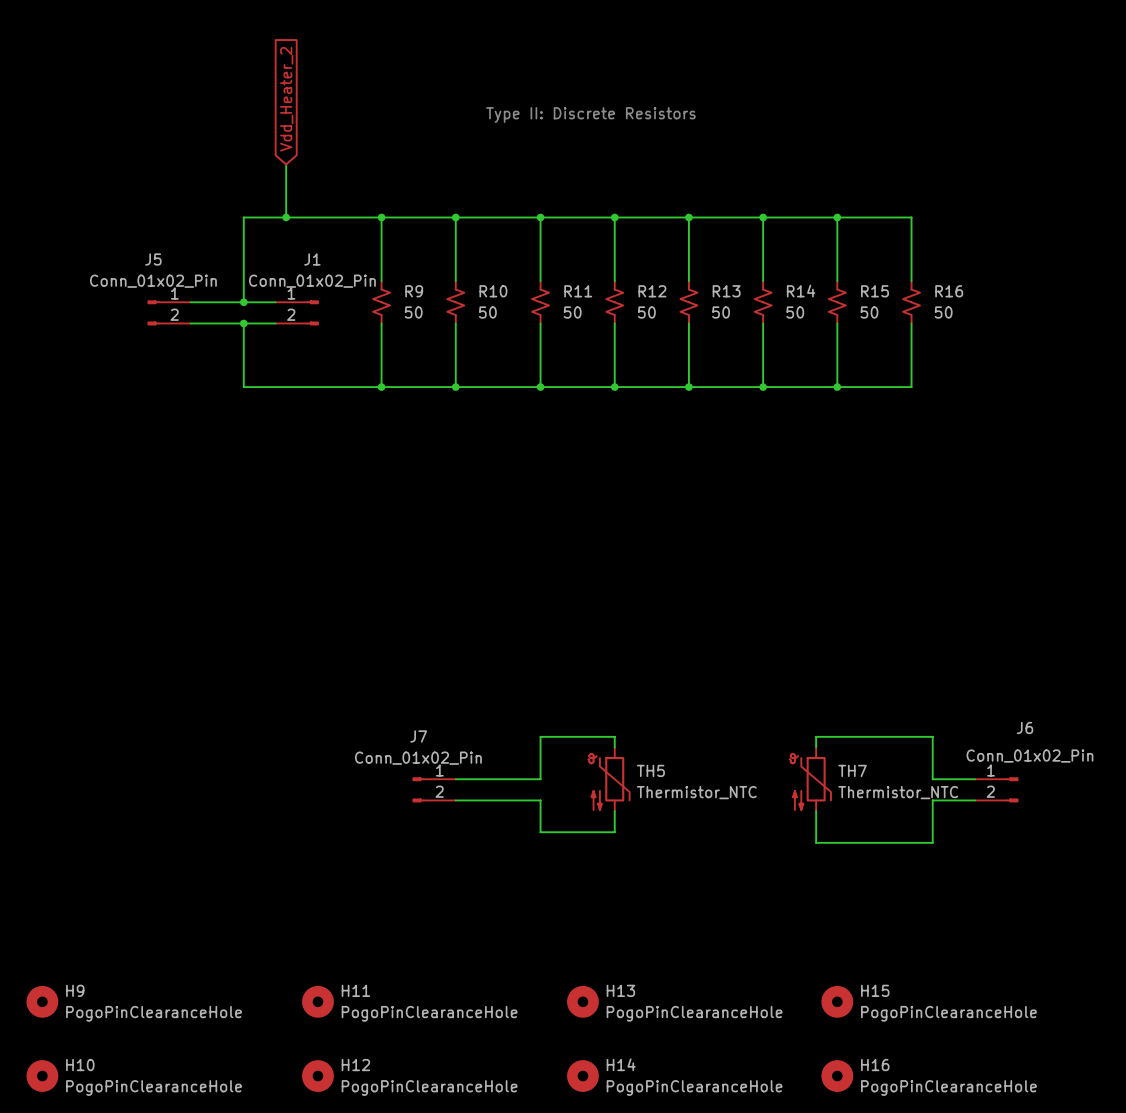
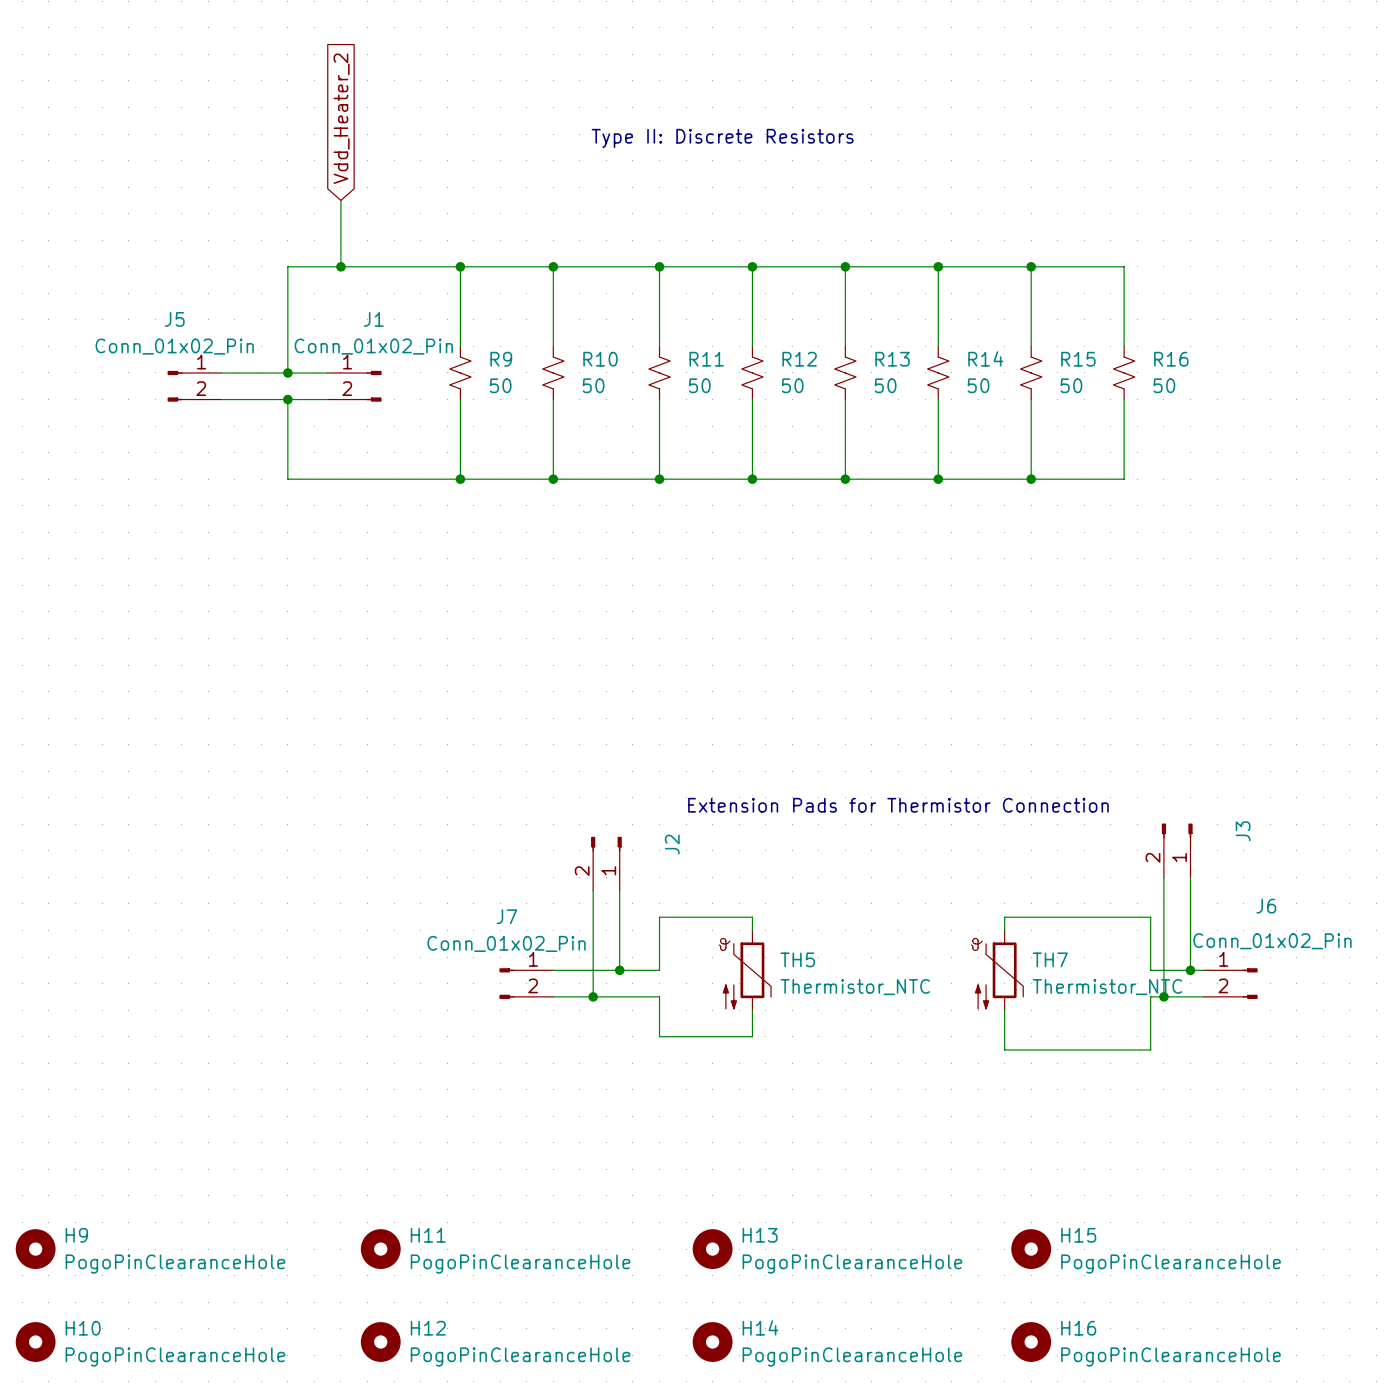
text: none -> Extension Pads for Thermistor Connection (898, 805)
J3: none -> (1177, 850)
J2: none -> (606, 863)
wire: none -> (1163, 877) (1163, 996)
wire: none -> (1190, 877) (1190, 970)
wire: none -> (593, 890) (593, 996)
wire: none -> (619, 890) (619, 970)
junction: none -> (619, 970)
junction: none -> (1190, 970)
junction: none -> (593, 996)
junction: none -> (1163, 996)

